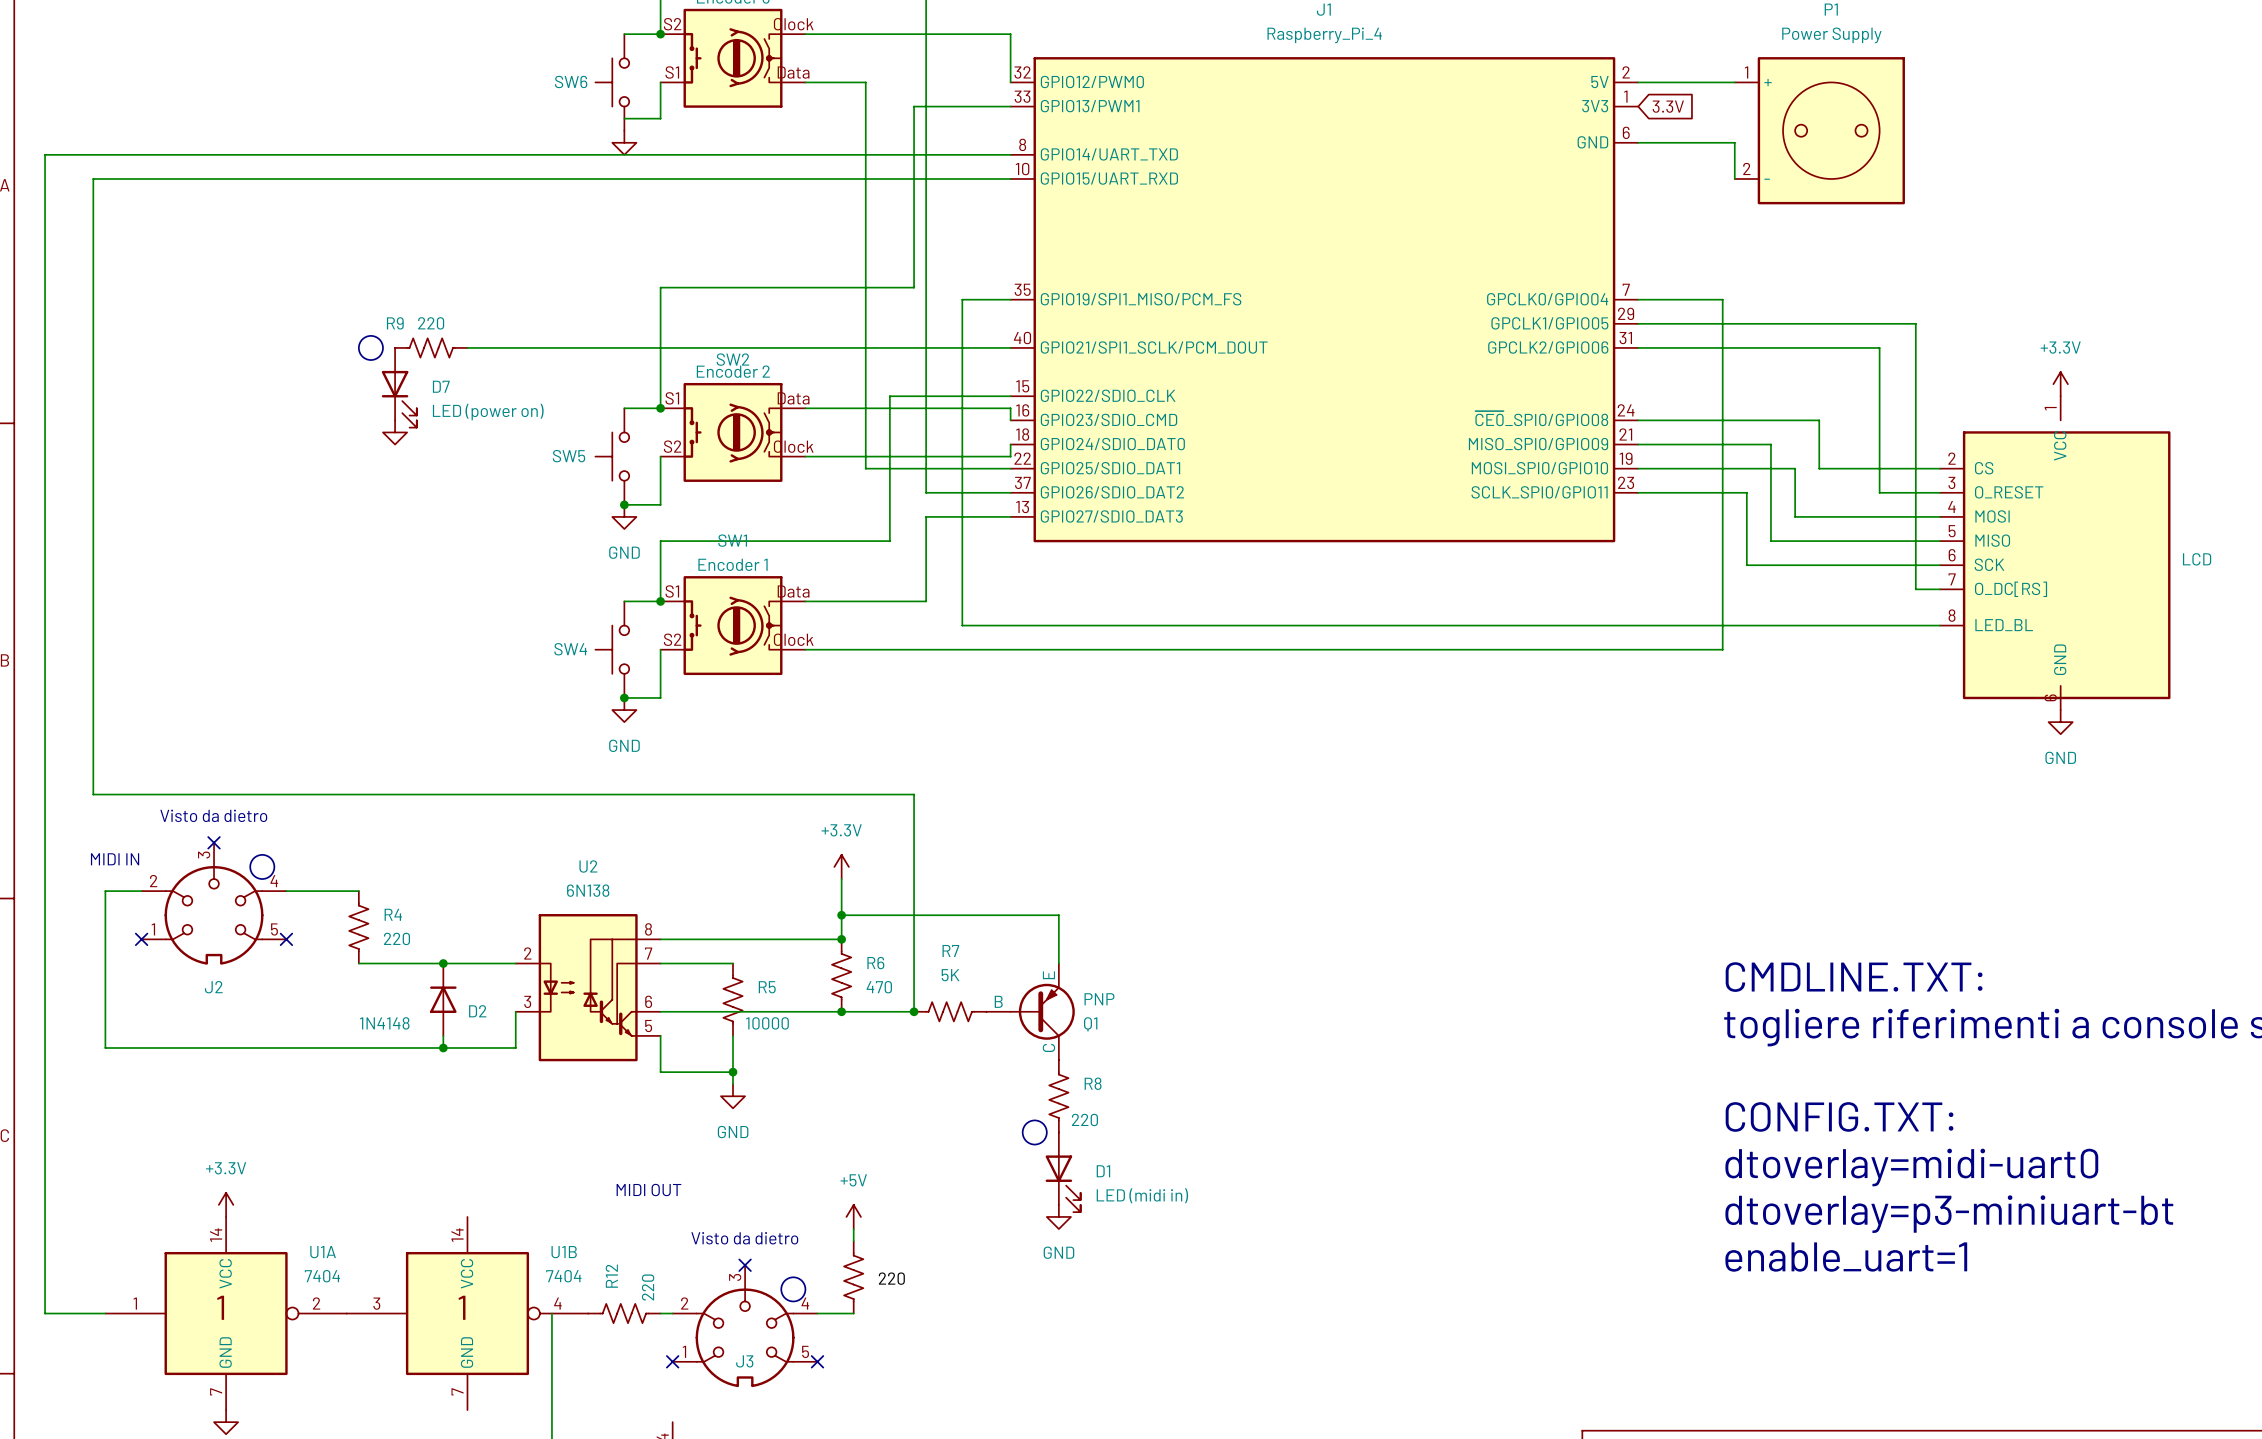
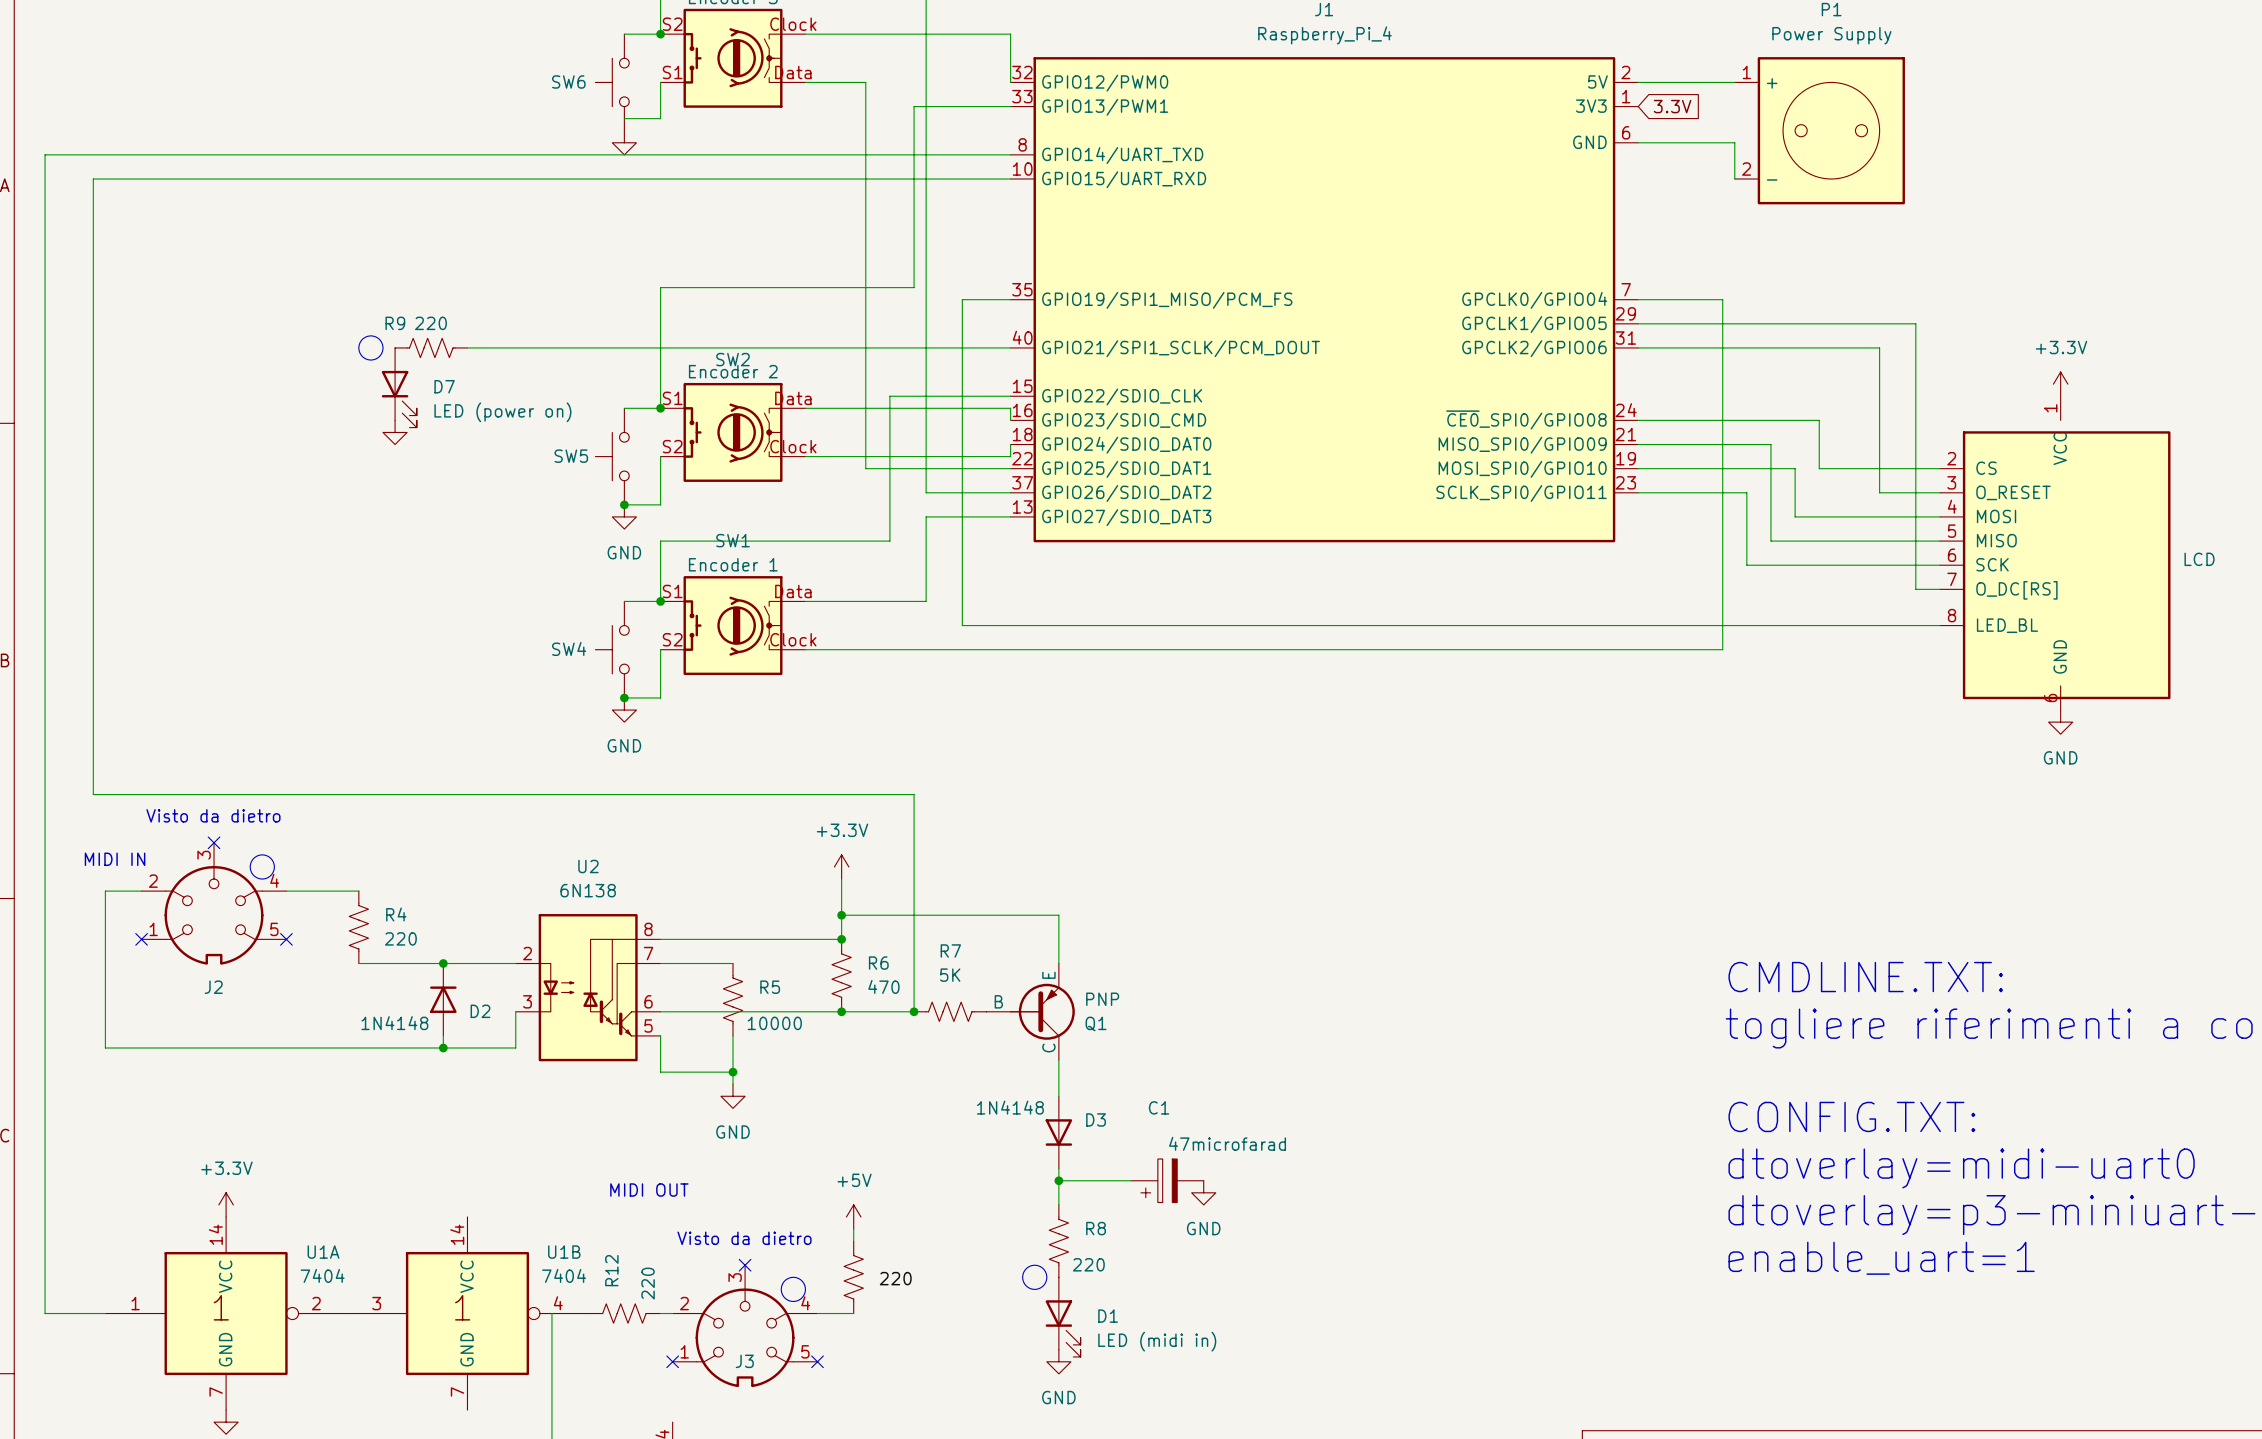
R8 position: (1058, 1096) -> (1058, 1241)
drawing position: (1034, 1132) -> (1034, 1277)
D3: none -> 1N4148 (1058, 1132)
D1 position: (1063, 1172) -> (1063, 1317)
wire: none -> (1058, 1180) (1131, 1180)
junction: none -> (1058, 1180)
C1: none -> 47microfarad (1167, 1180)
power symbol: none -> GND (1203, 1192)
power symbol: GND (1058, 1216) -> none
power symbol: none -> GND (1058, 1361)

